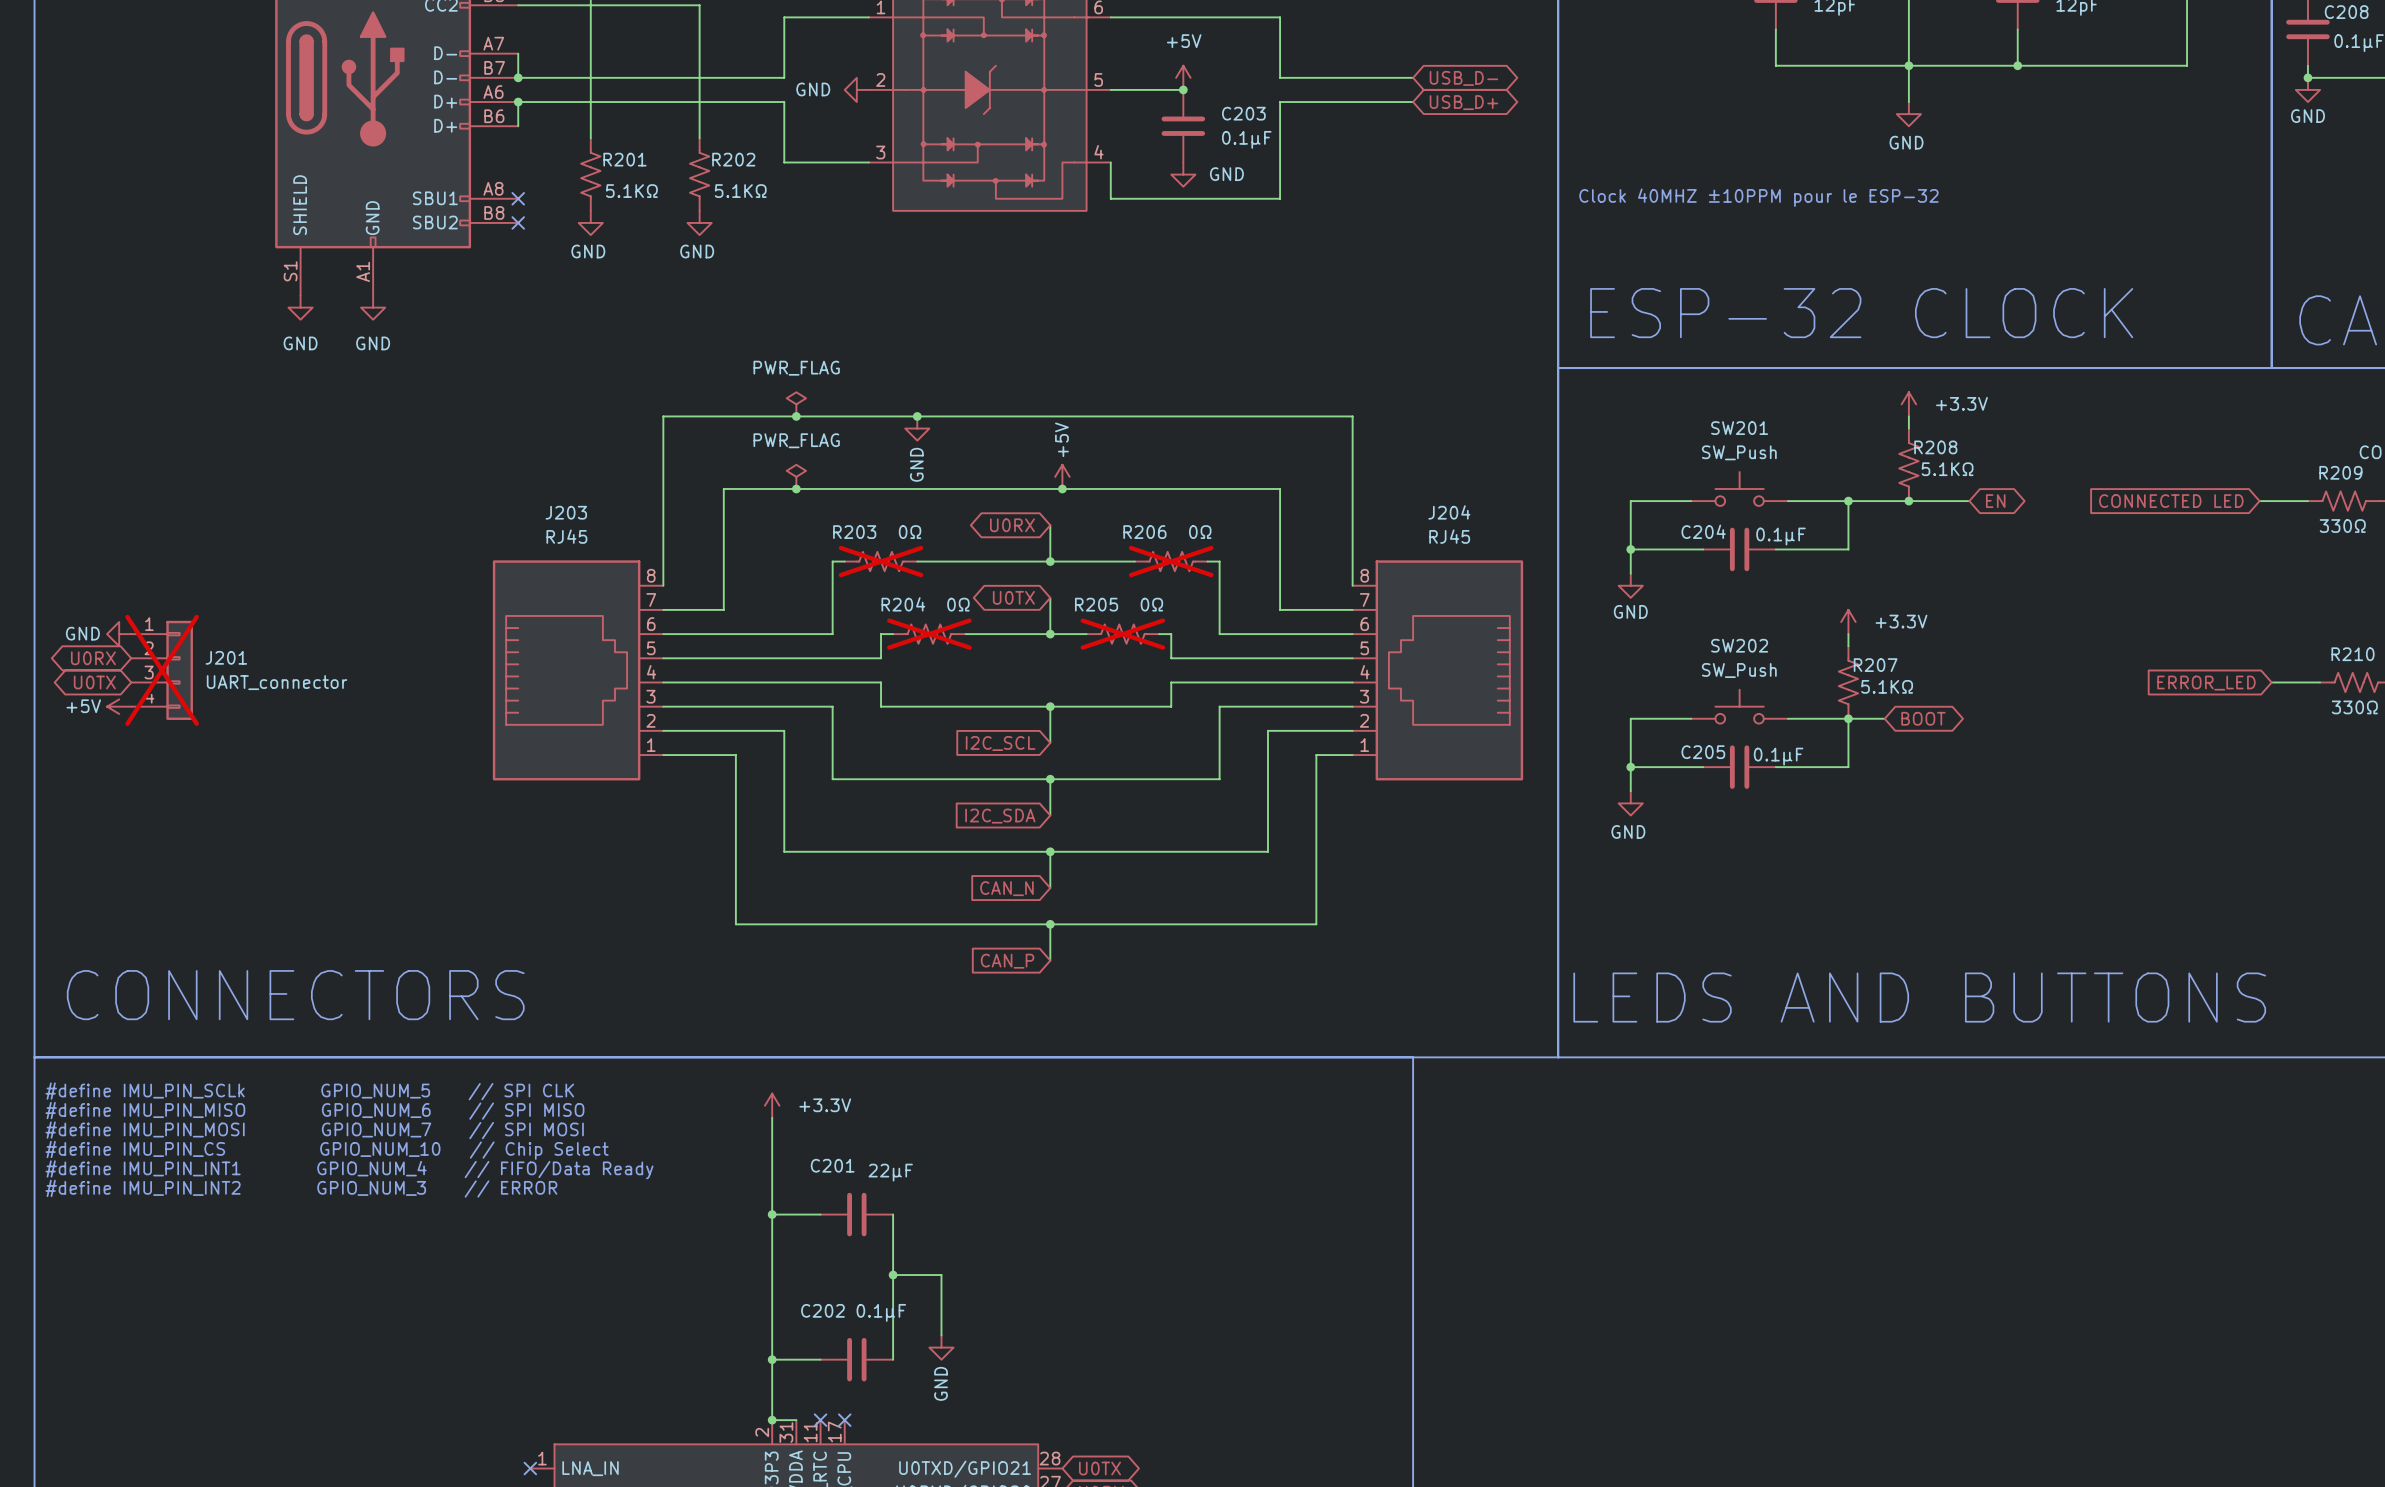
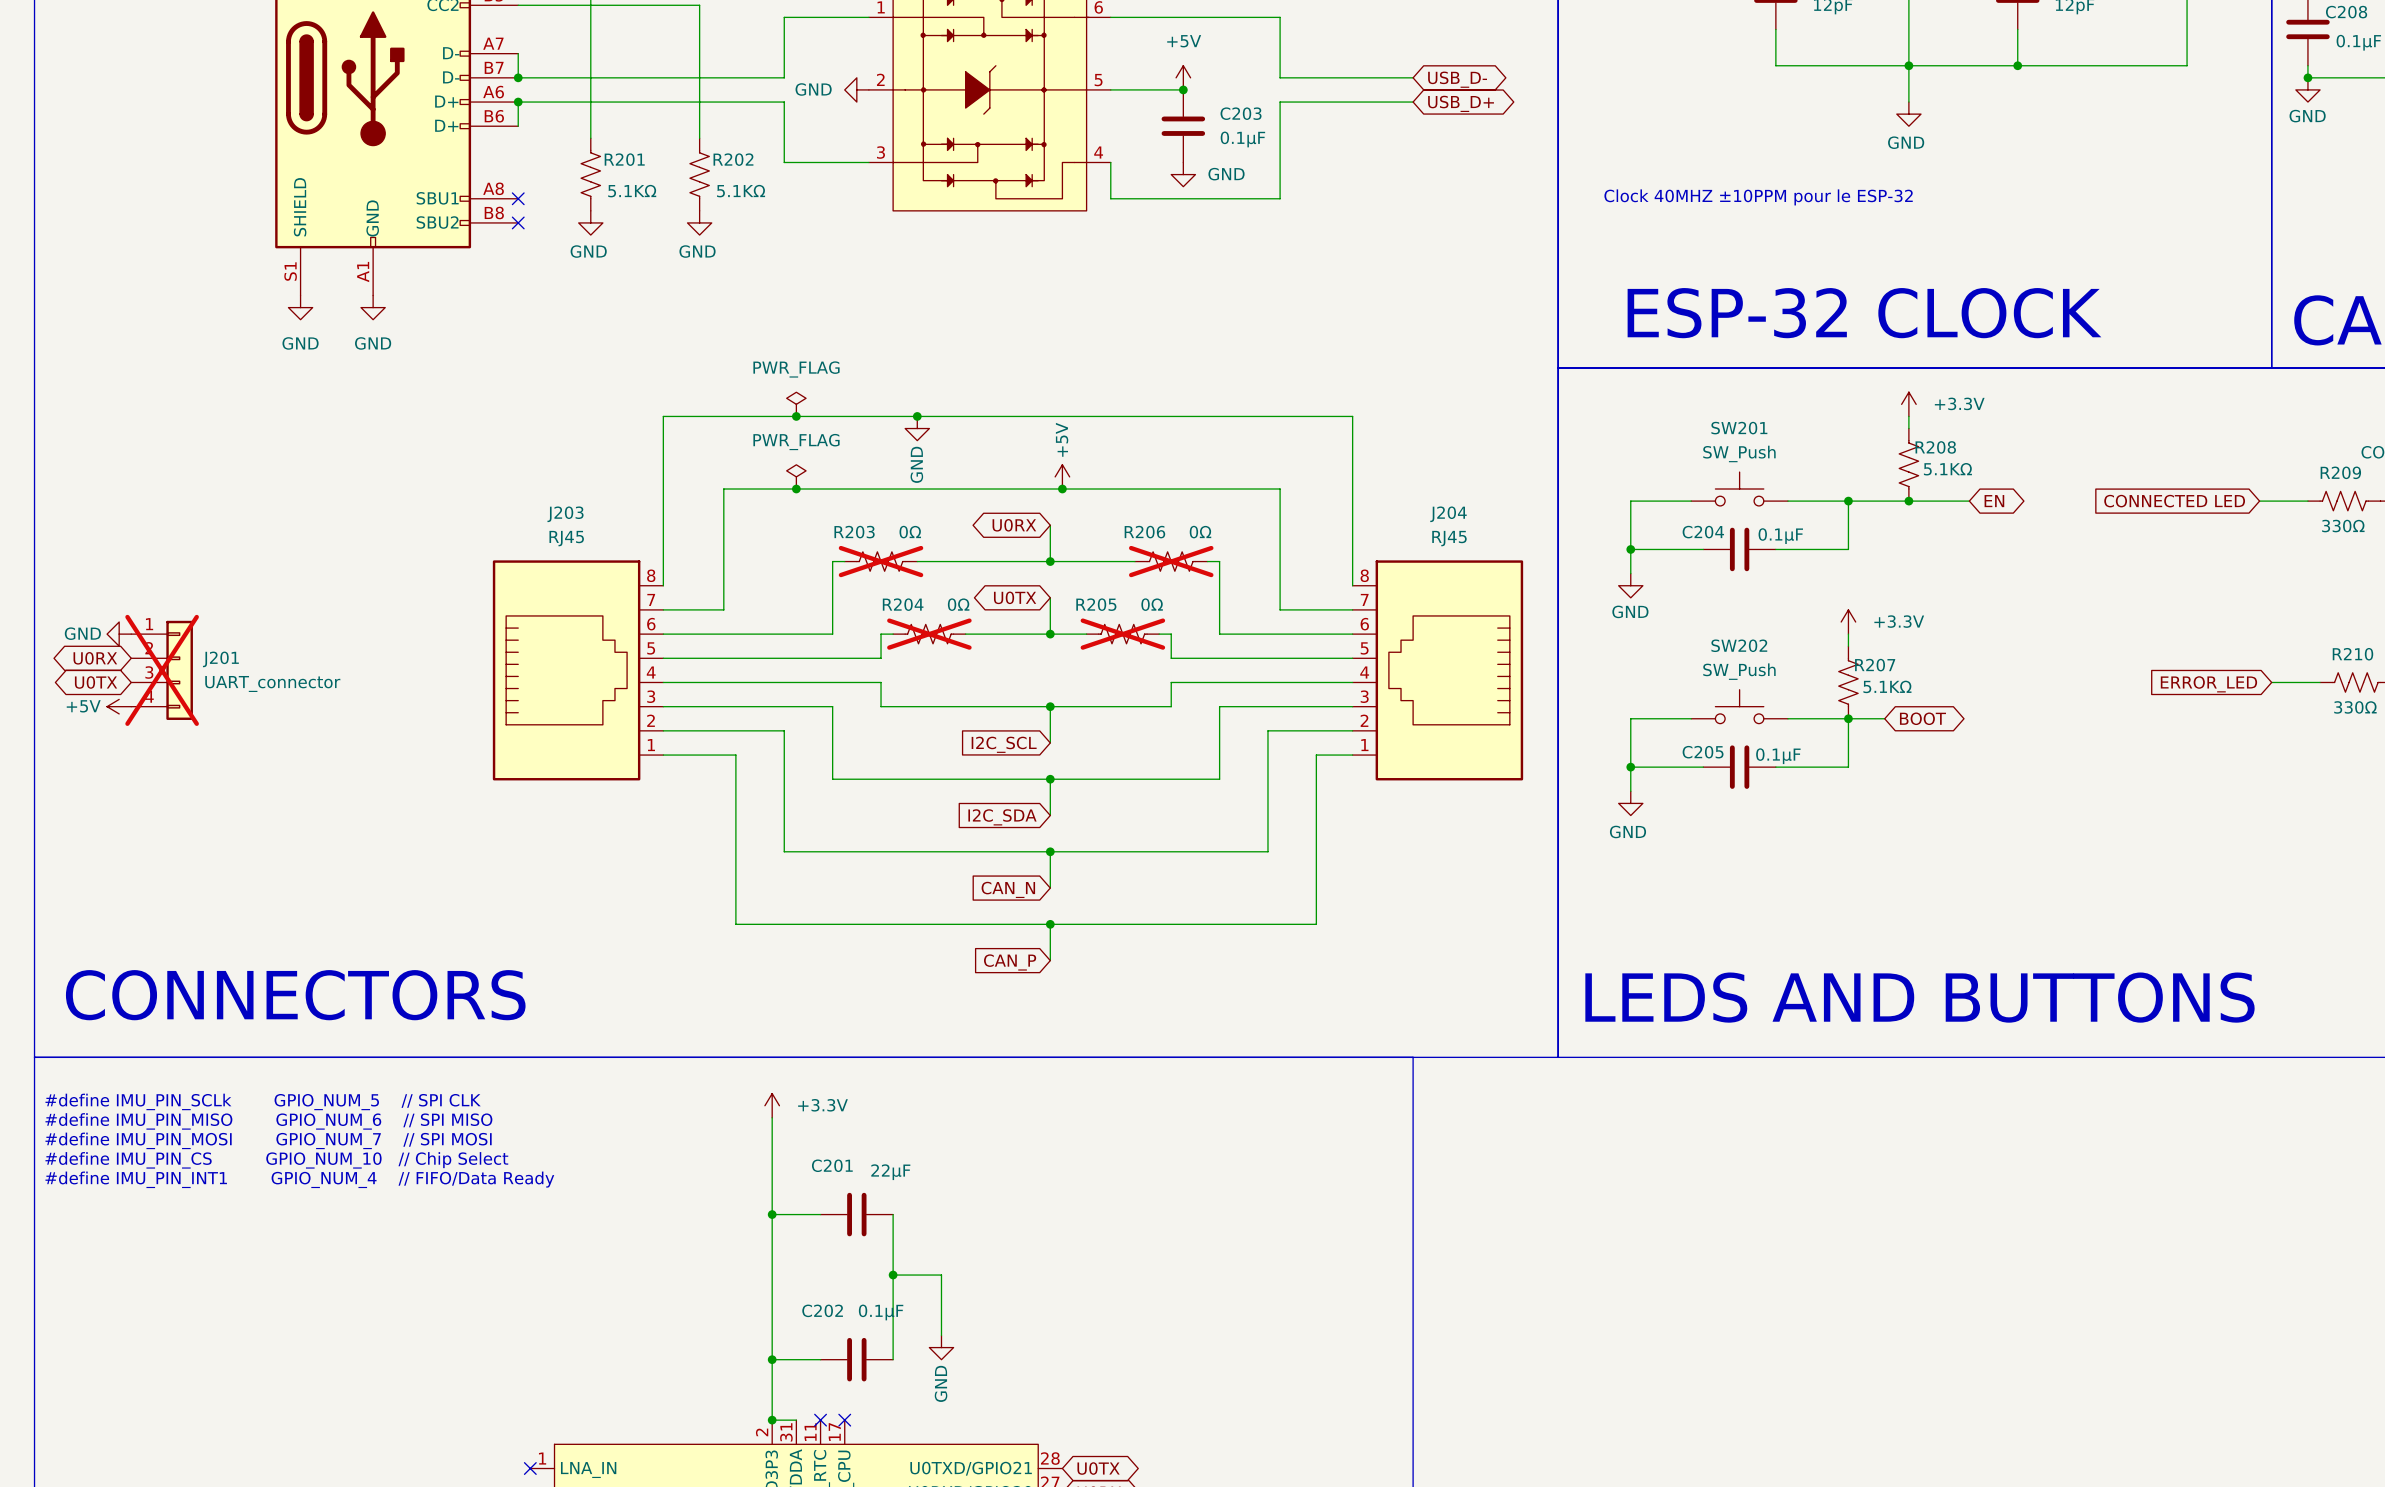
text position: #define IMU_PIN_SCLk GPIO_NUM_5 // SPI CLK (309, 1091) -> #define IMU_PIN_SCLk GPIO_NUM_5 // SPI CLK (263, 1101)
text position: #define IMU_PIN_MISO GPIO_NUM_6 // SPI MISO (314, 1110) -> #define IMU_PIN_MISO GPIO_NUM_6 // SPI MISO (268, 1121)
text position: #define IMU_PIN_MOSI GPIO_NUM_7 // SPI MOSI (314, 1130) -> #define IMU_PIN_MOSI GPIO_NUM_7 // SPI MOSI (268, 1140)
text position: #define IMU_PIN_CS GPIO_NUM_10 // Chip Select (327, 1150) -> #define IMU_PIN_CS GPIO_NUM_10 // Chip Select (276, 1160)
text position: #define IMU_PIN_INT1 GPIO_NUM_4 // FIFO/Data Ready (349, 1169) -> #define IMU_PIN_INT1 GPIO_NUM_4 // FIFO/Data Ready (299, 1179)
text: #define IMU_PIN_INT2 GPIO_NUM_3 // ERROR (301, 1188) -> none

